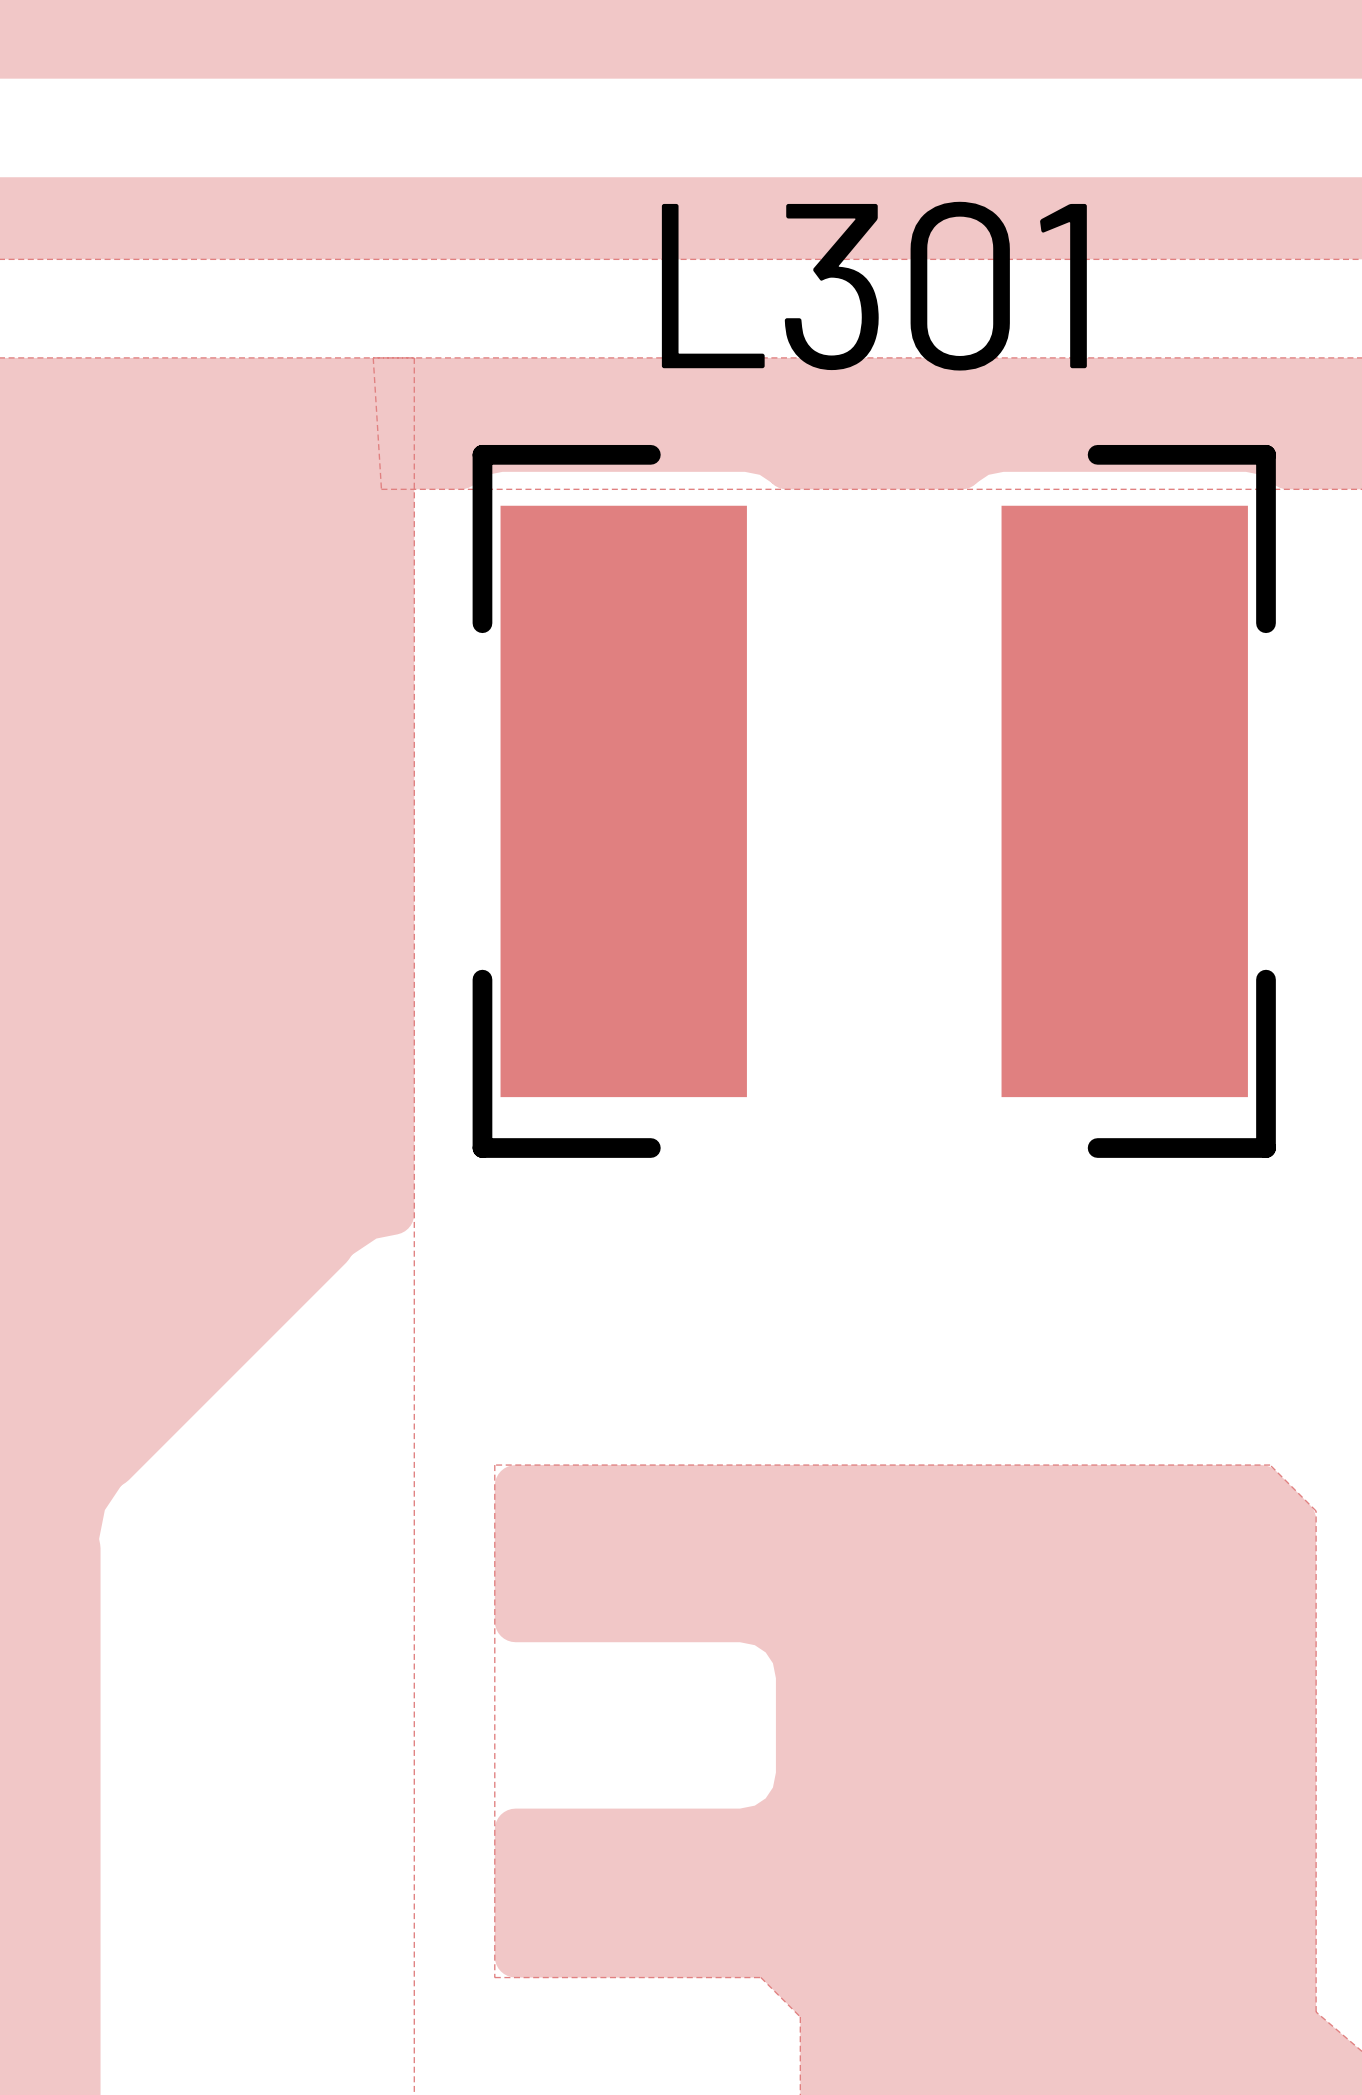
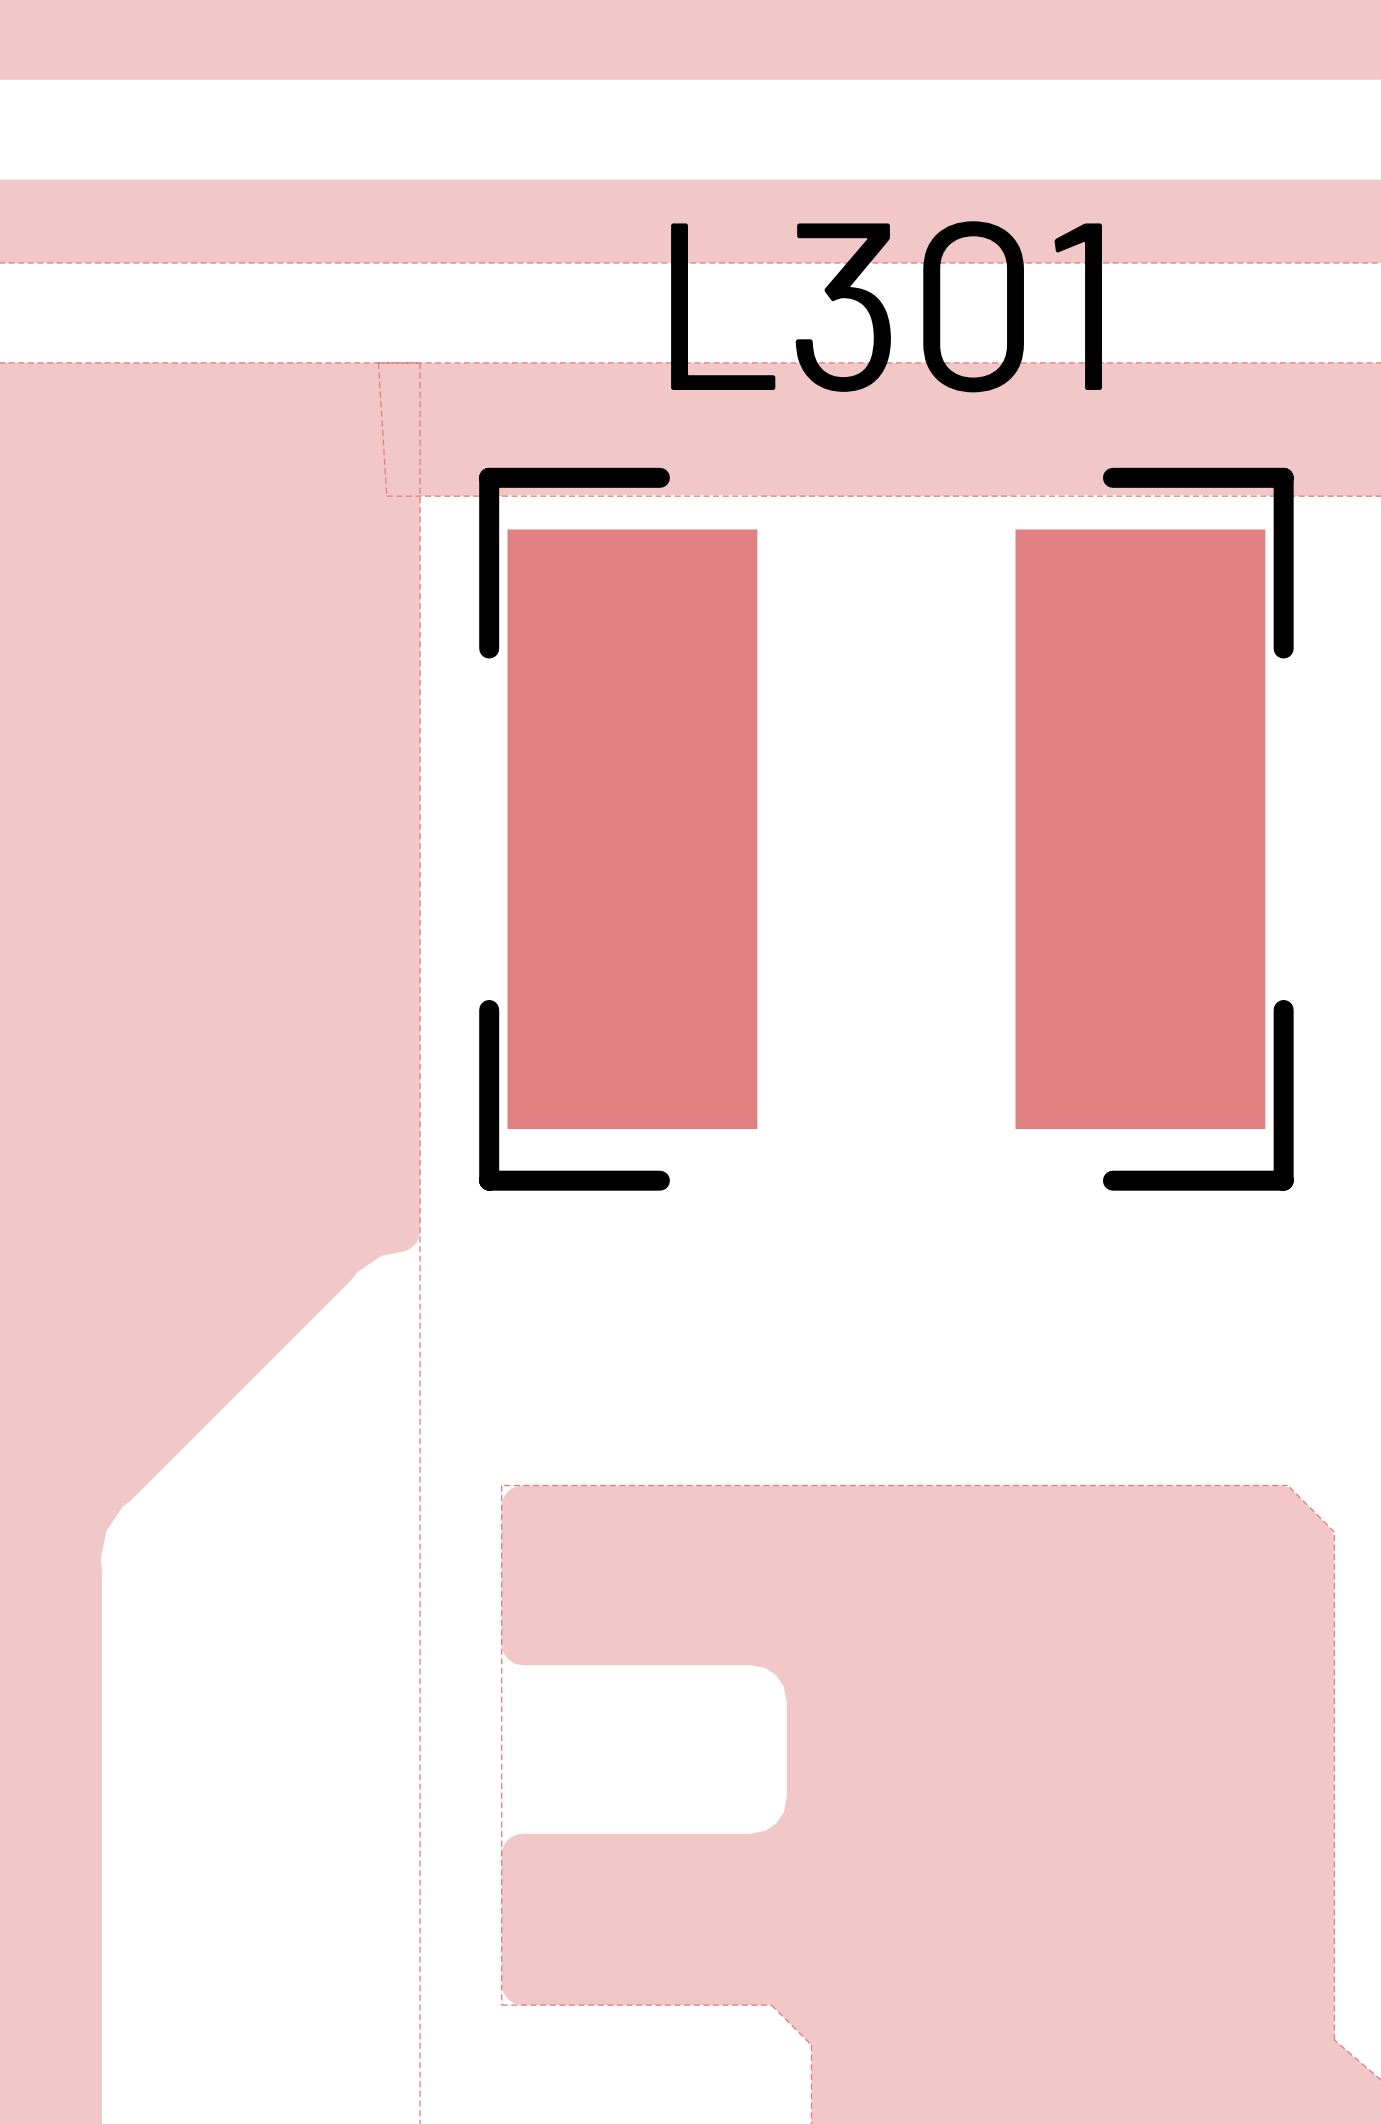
L301 position: (874, 801) -> (886, 829)

